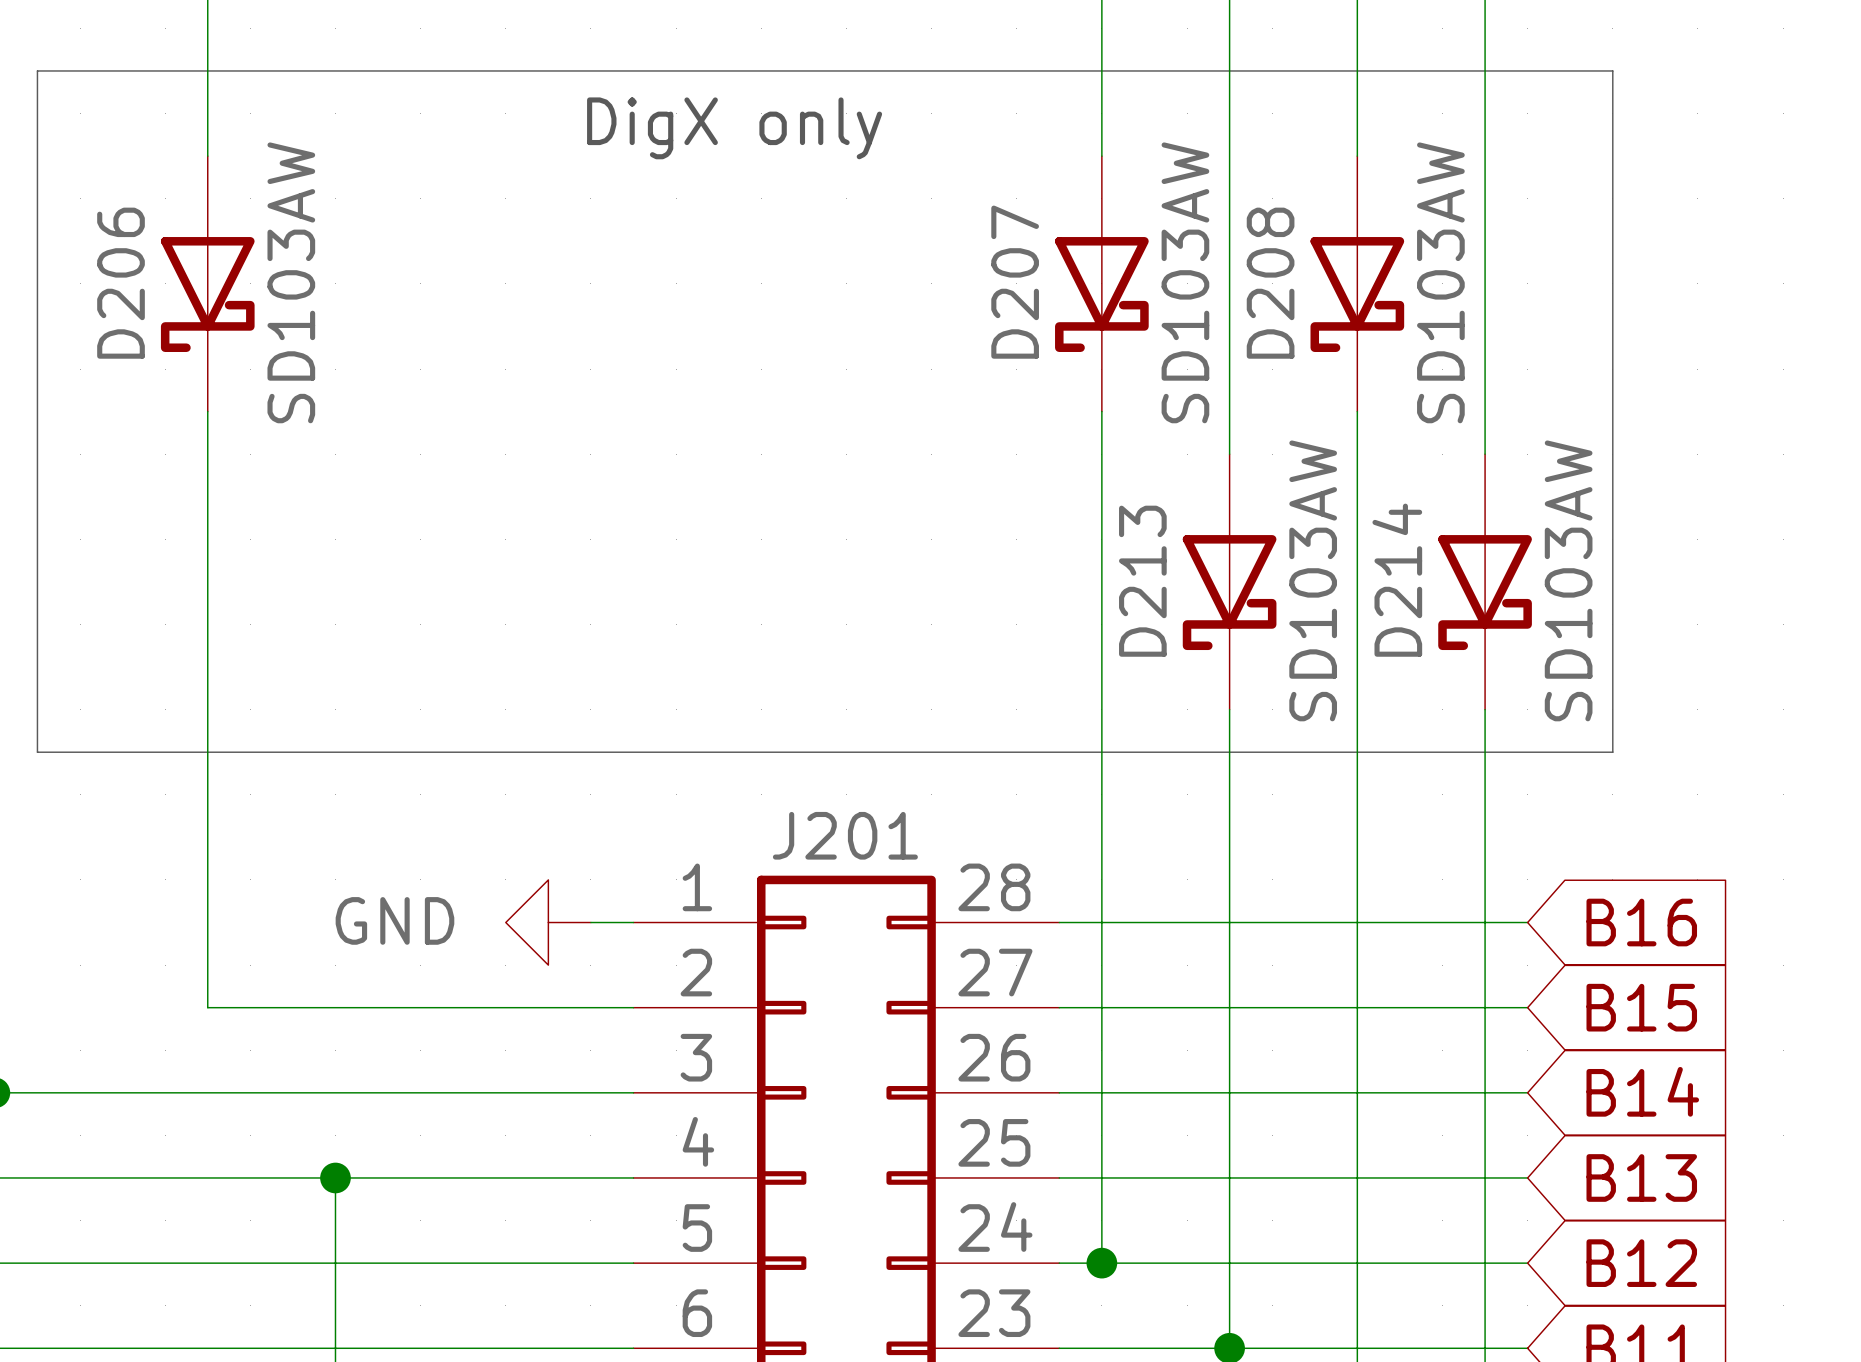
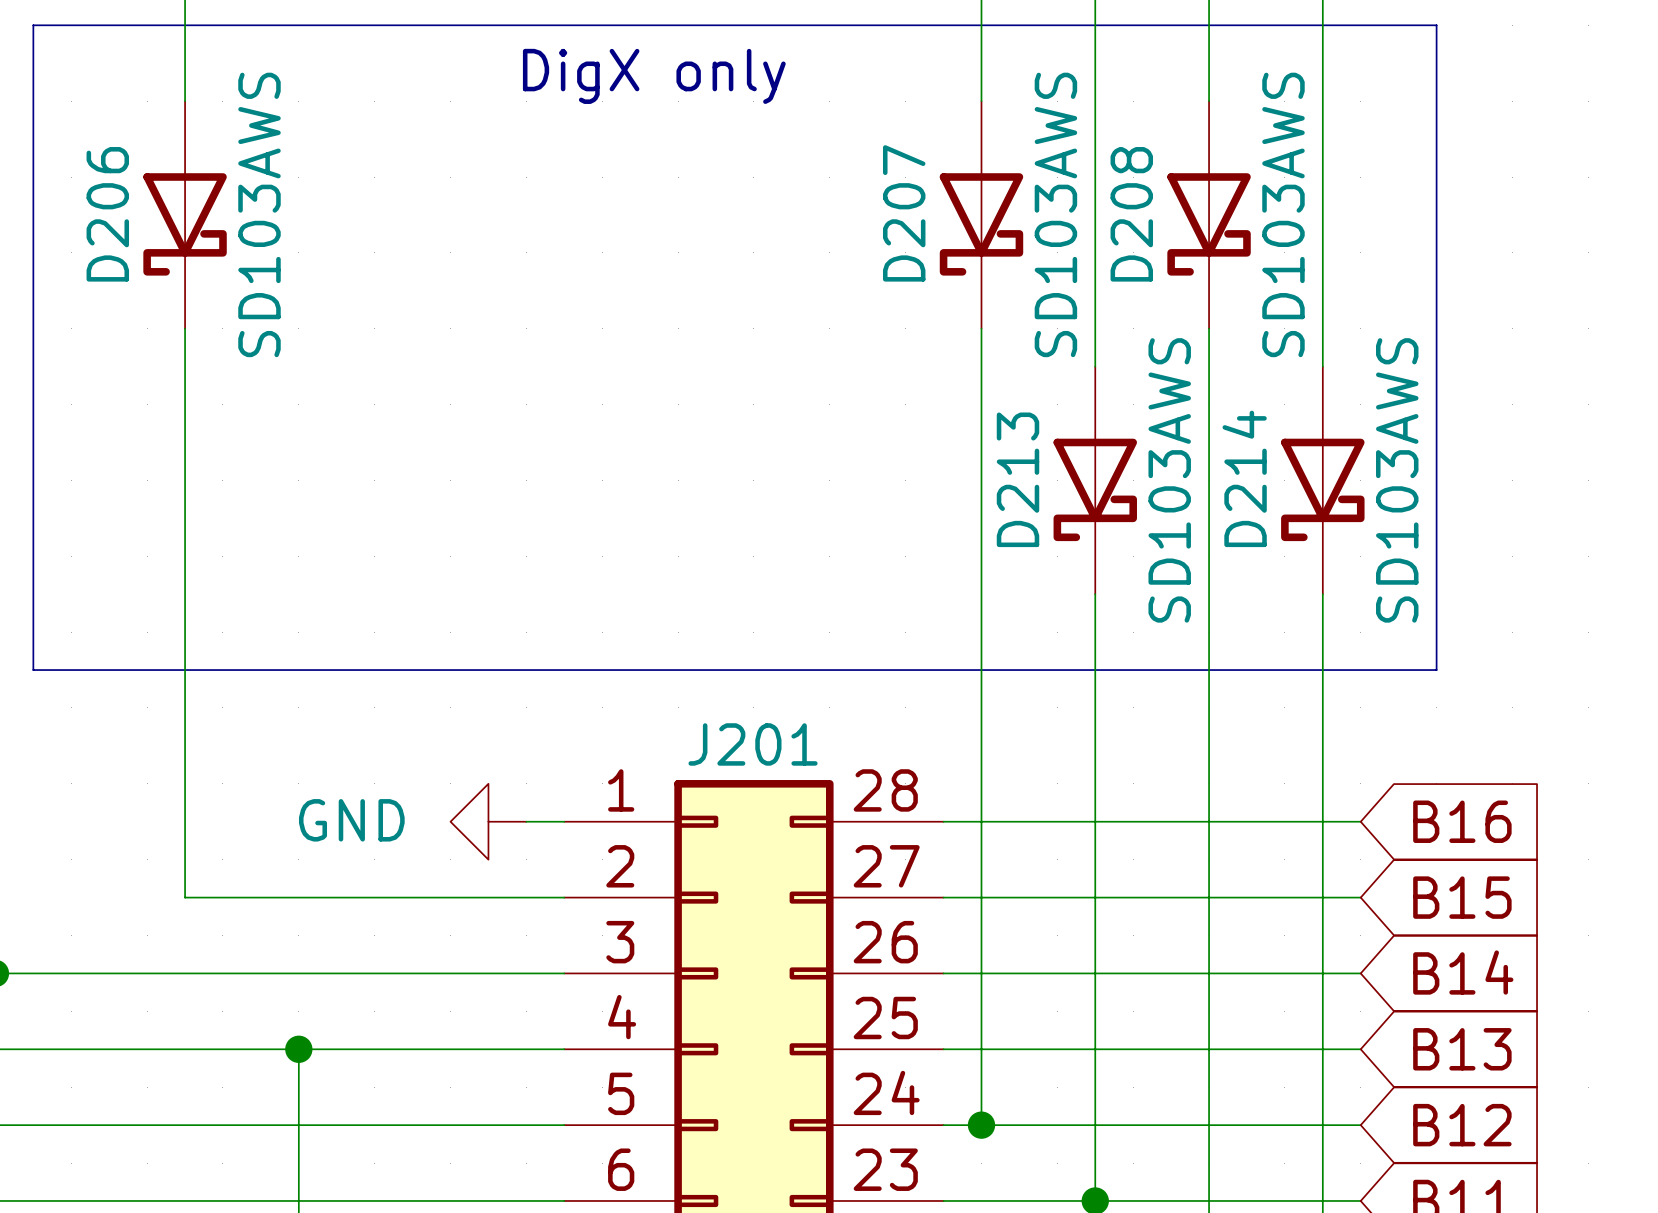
line: (37, 70) (1612, 70) -> (33, 63) (33, 25) (1436, 25) (1436, 63)
text position: DigX only (734, 128) -> DigX only (654, 76)
D206 value: SD103AW (291, 282) -> SD103AWS (259, 214)
D207 value: SD103AW (1185, 282) -> SD103AWS (1055, 214)
D208 value: SD103AW (1440, 282) -> SD103AWS (1283, 214)
D206 position: (207, 283) -> (185, 214)
D207 position: (1101, 283) -> (981, 214)
D208 position: (1357, 283) -> (1209, 214)
D213 value: SD103AW (1313, 580) -> SD103AWS (1169, 480)
D214 value: SD103AW (1568, 580) -> SD103AWS (1397, 480)
D213 position: (1229, 581) -> (1095, 480)
D214 position: (1485, 581) -> (1322, 480)

